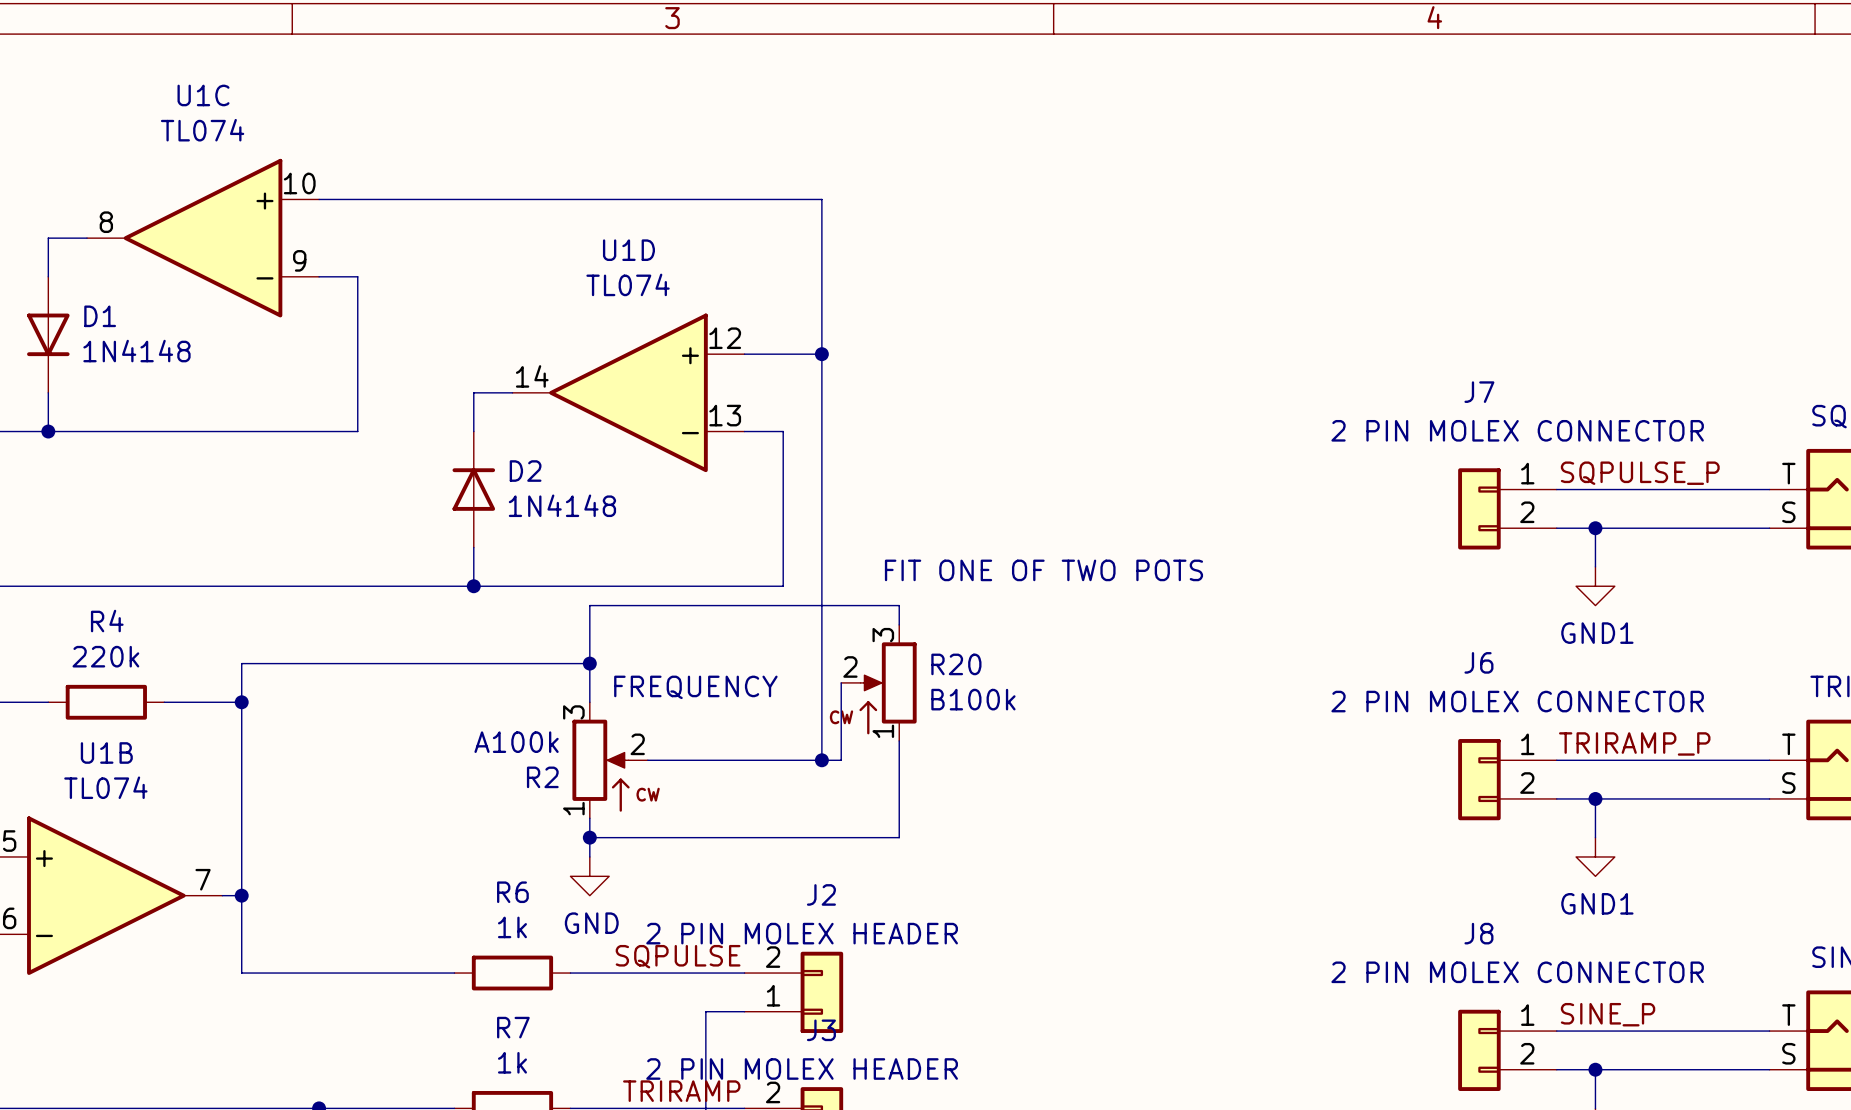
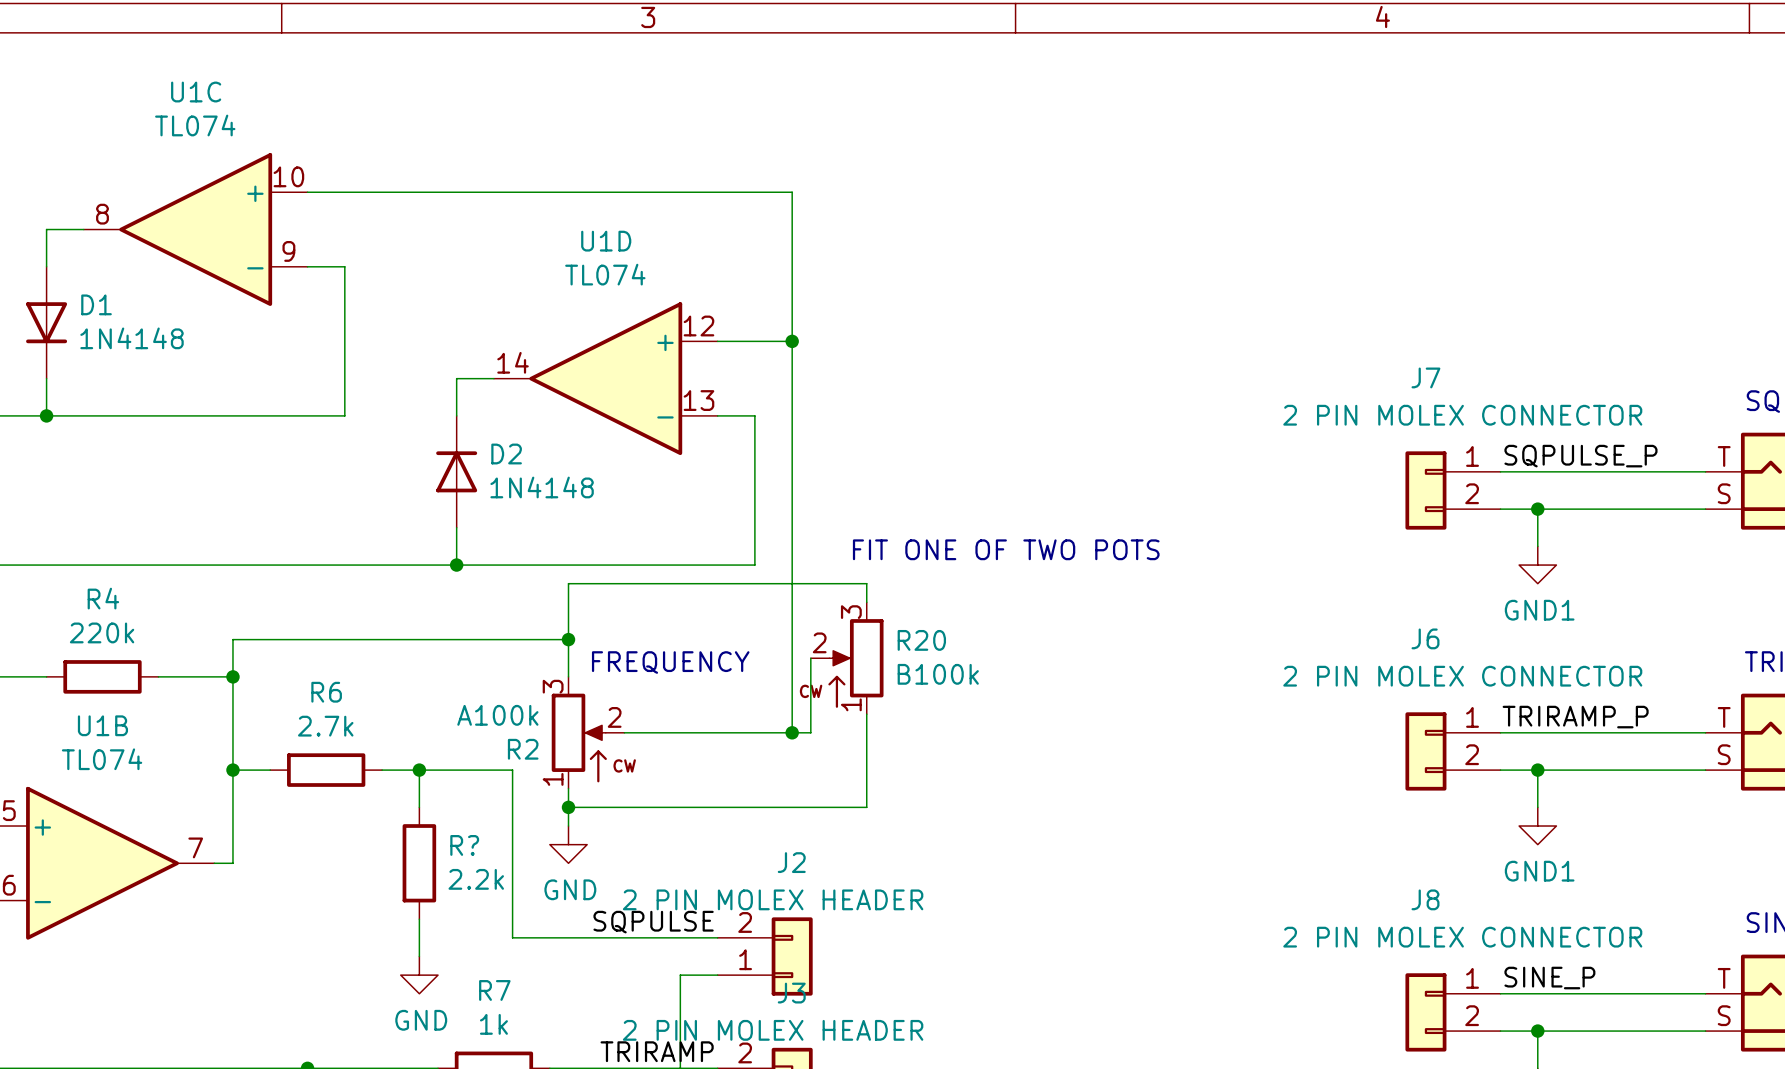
wire: none -> (232, 770) (270, 770)
junction: none -> (232, 770)
wire: none -> (382, 770) (512, 770) (512, 937) (549, 937)
wire: none -> (419, 770) (419, 807)
junction: none -> (419, 770)
wire: (241, 895) (241, 973) (454, 973) -> none
junction: (241, 895) -> none
R?: none -> 2.2k (419, 863)
R6 value: 1k (512, 927) -> 2.7k (325, 726)
wire: none -> (419, 919) (419, 956)
R6 position: (512, 973) -> (326, 770)
power symbol: none -> GND (419, 975)

